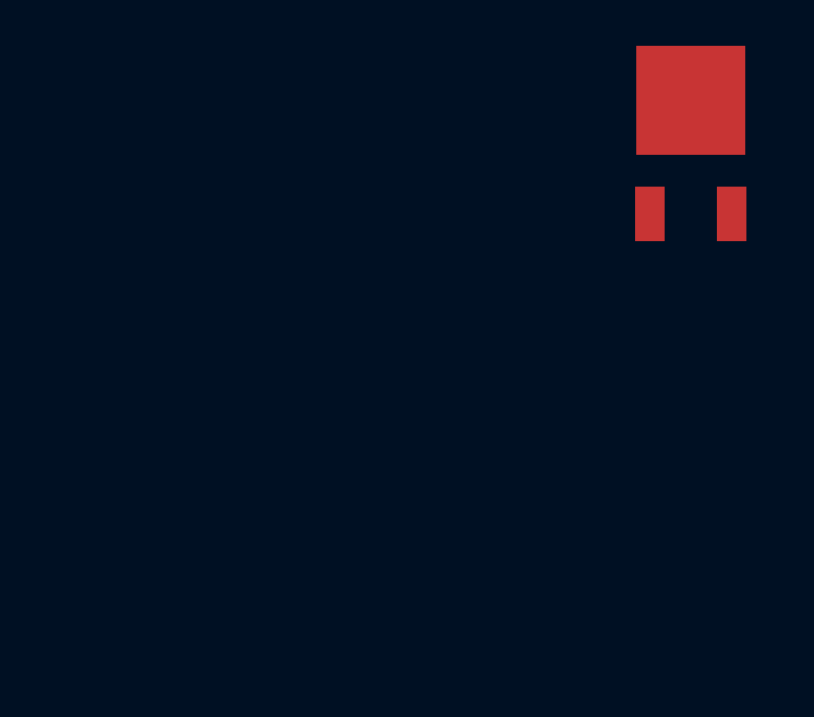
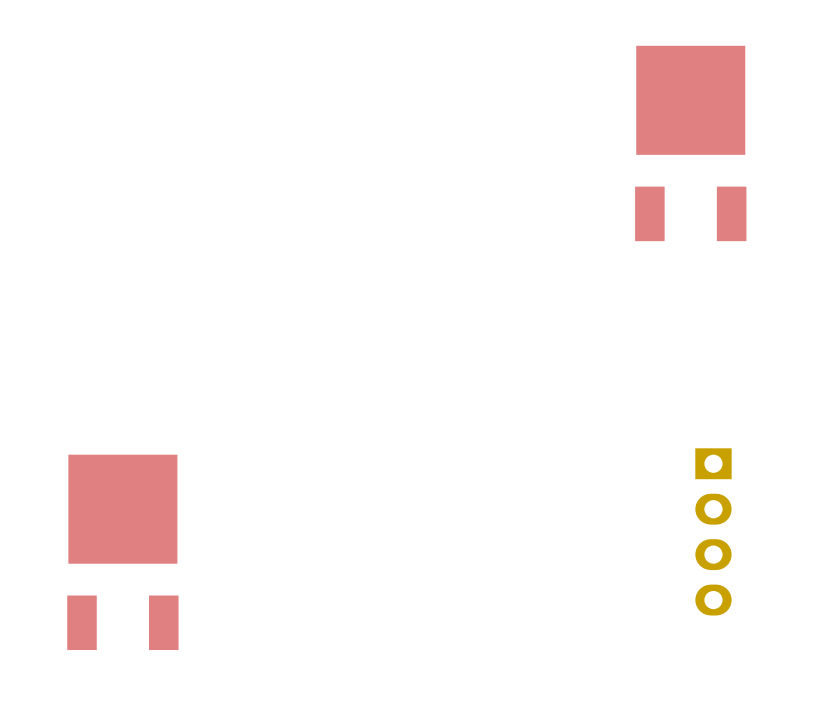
part: none -> (713, 531)
part: none -> (122, 552)

